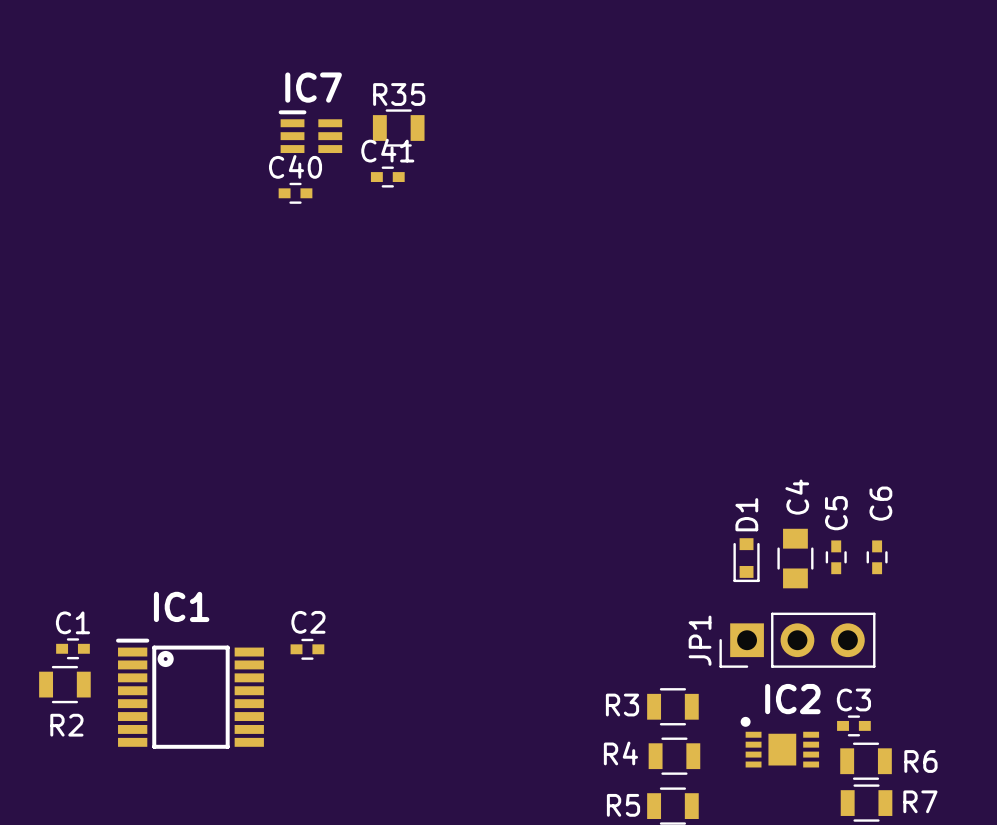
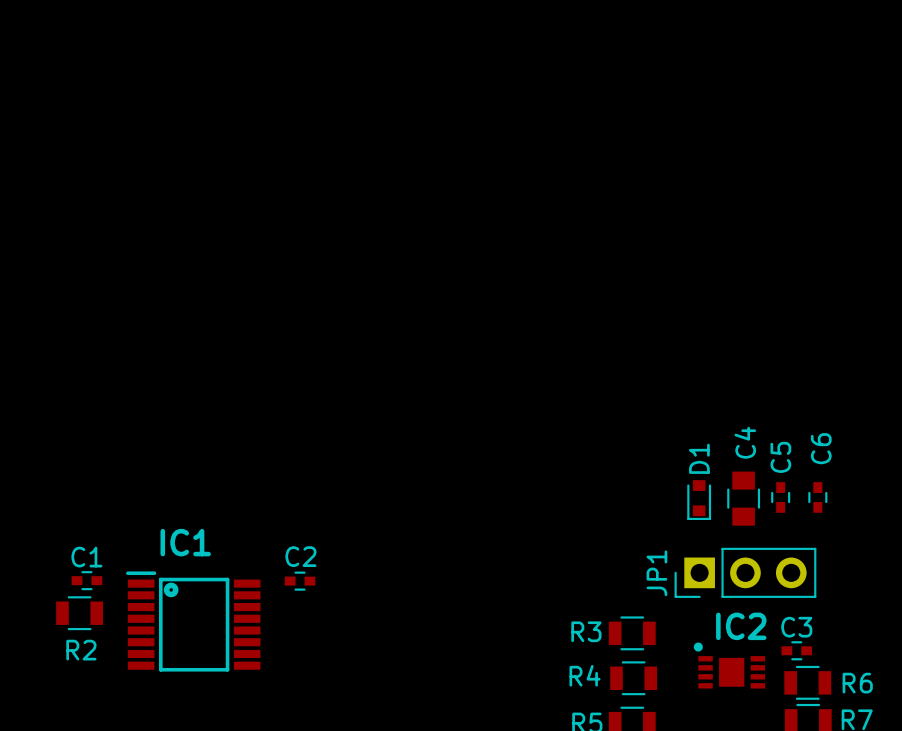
R35: (398, 128) -> none
IC7: (310, 131) -> none
C41: (387, 177) -> none
C40: (295, 193) -> none

